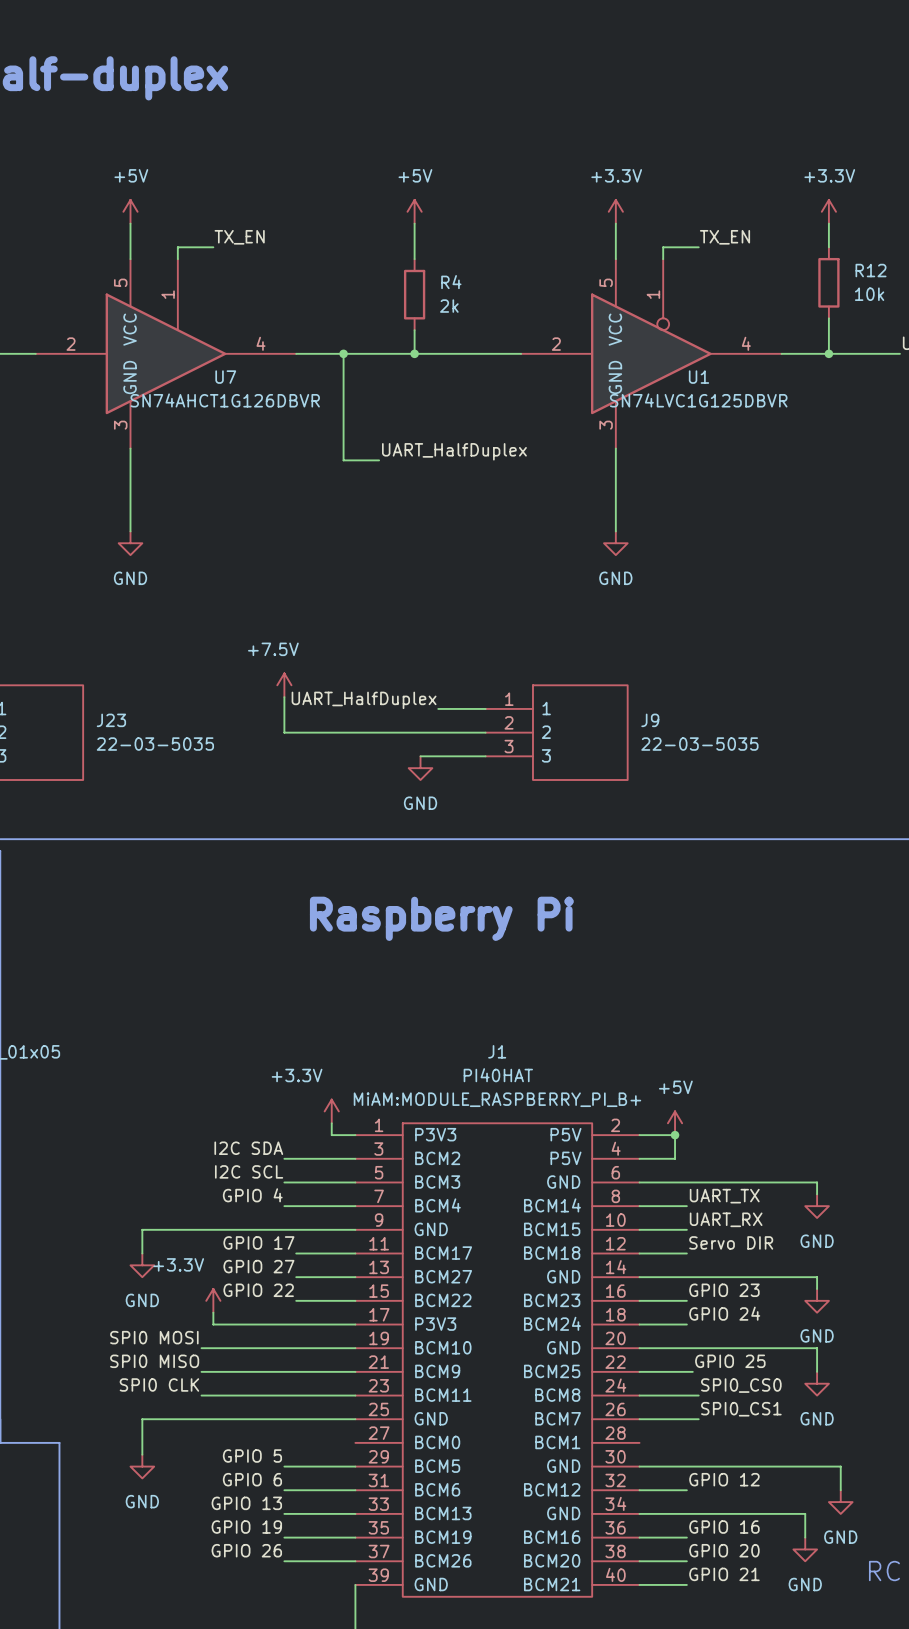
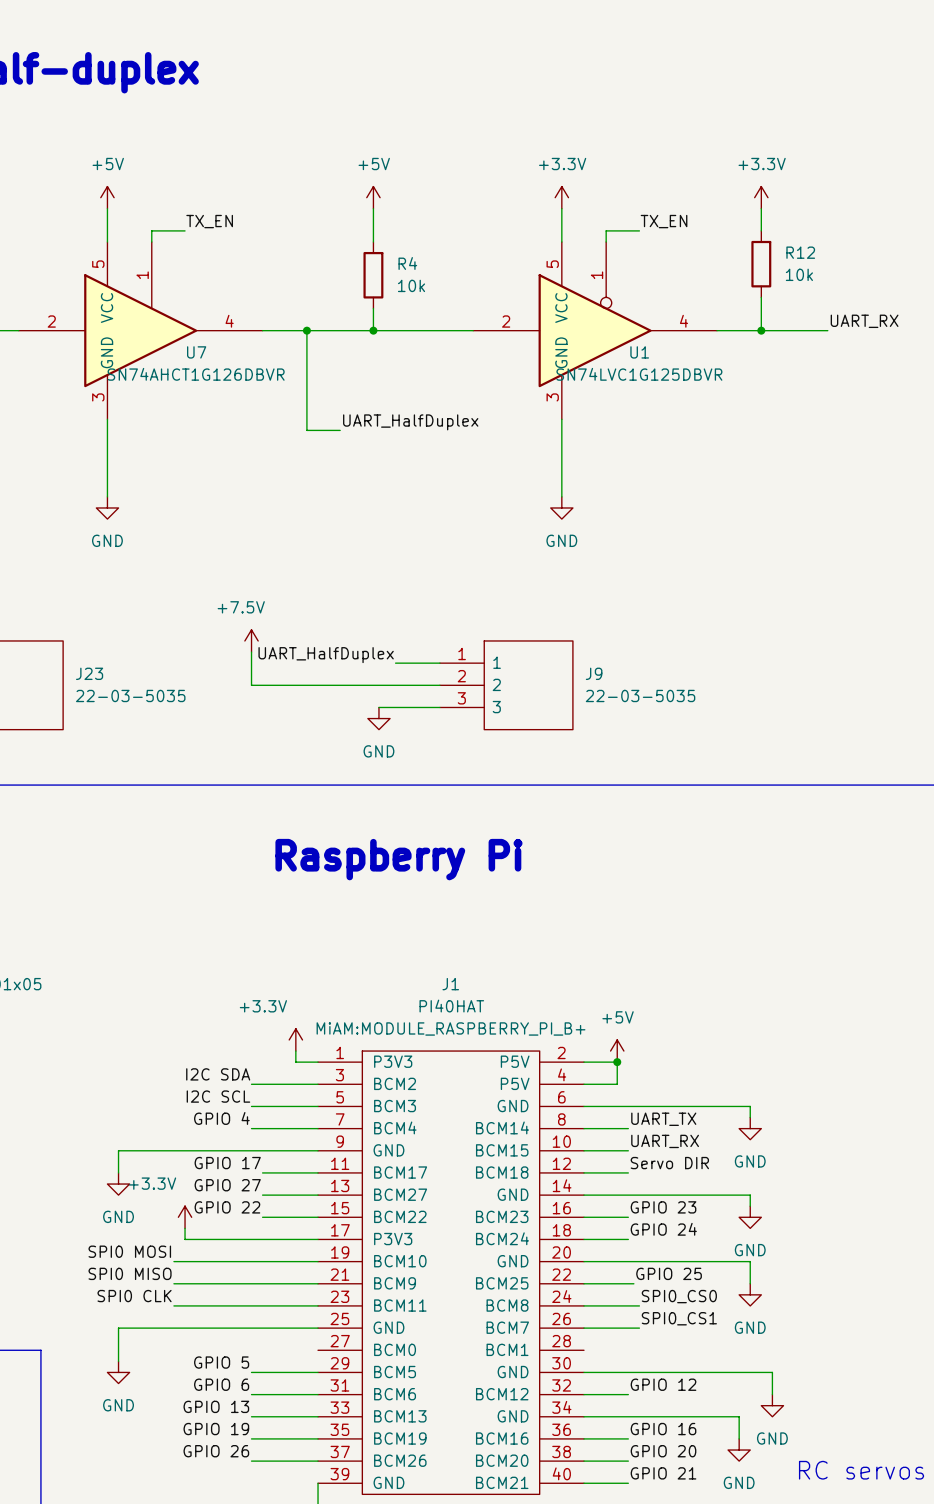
R4 value: 2k (449, 306) -> 10k (411, 285)

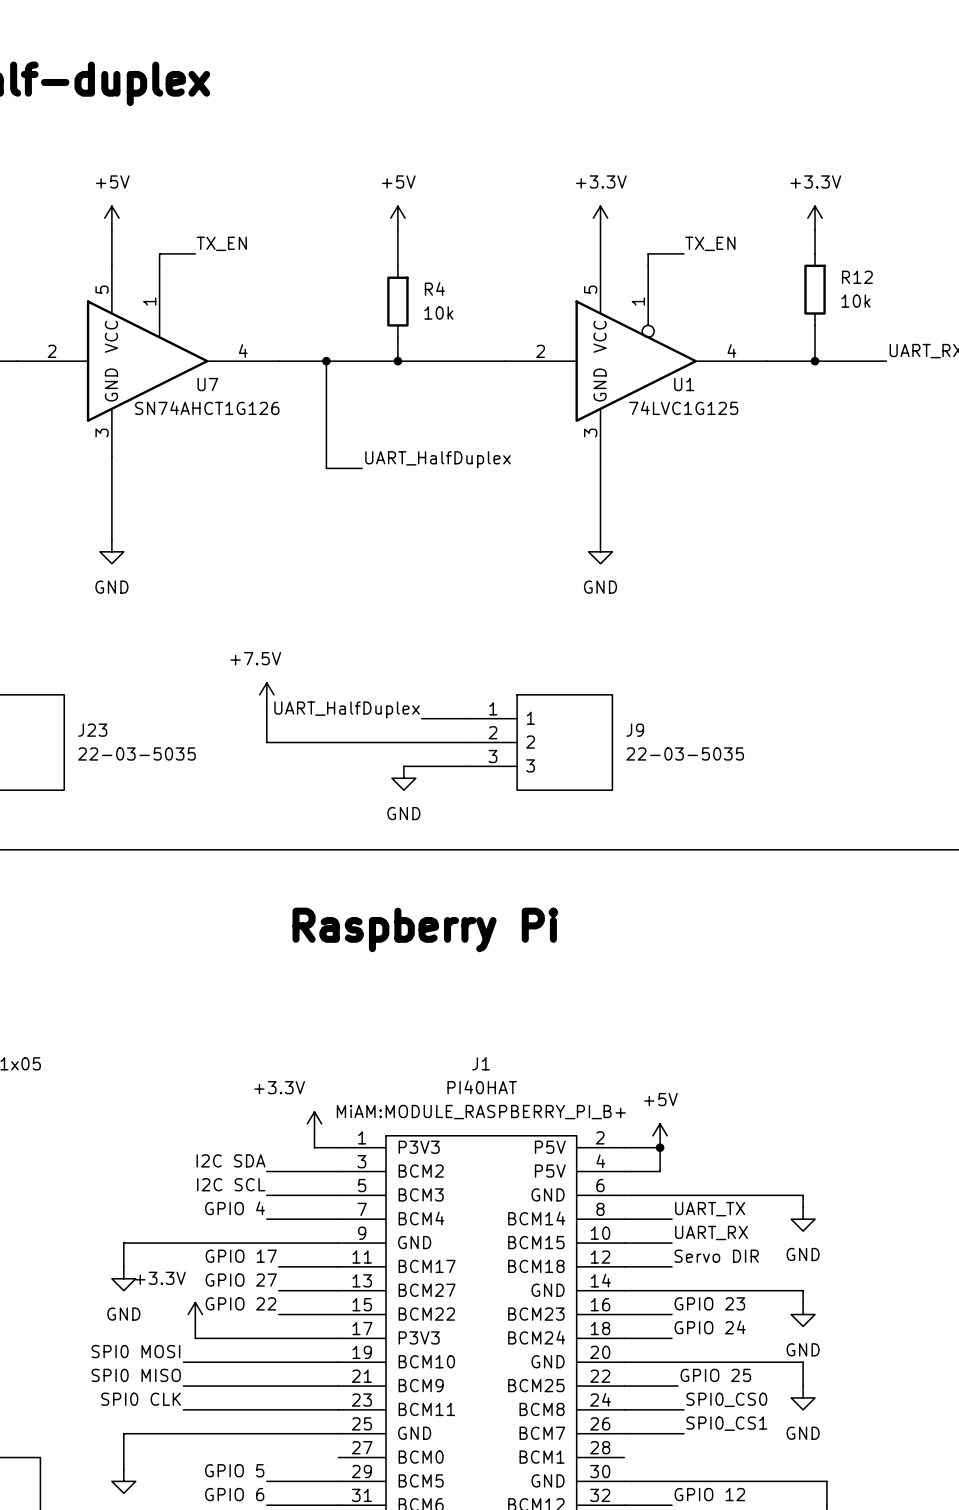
U7 value: SN74AHCT1G126DBVR (196, 374) -> SN74AHCT1G126 (207, 408)
U1 value: SN74LVC1G125DBVR (639, 374) -> 74LVC1G125 (683, 408)

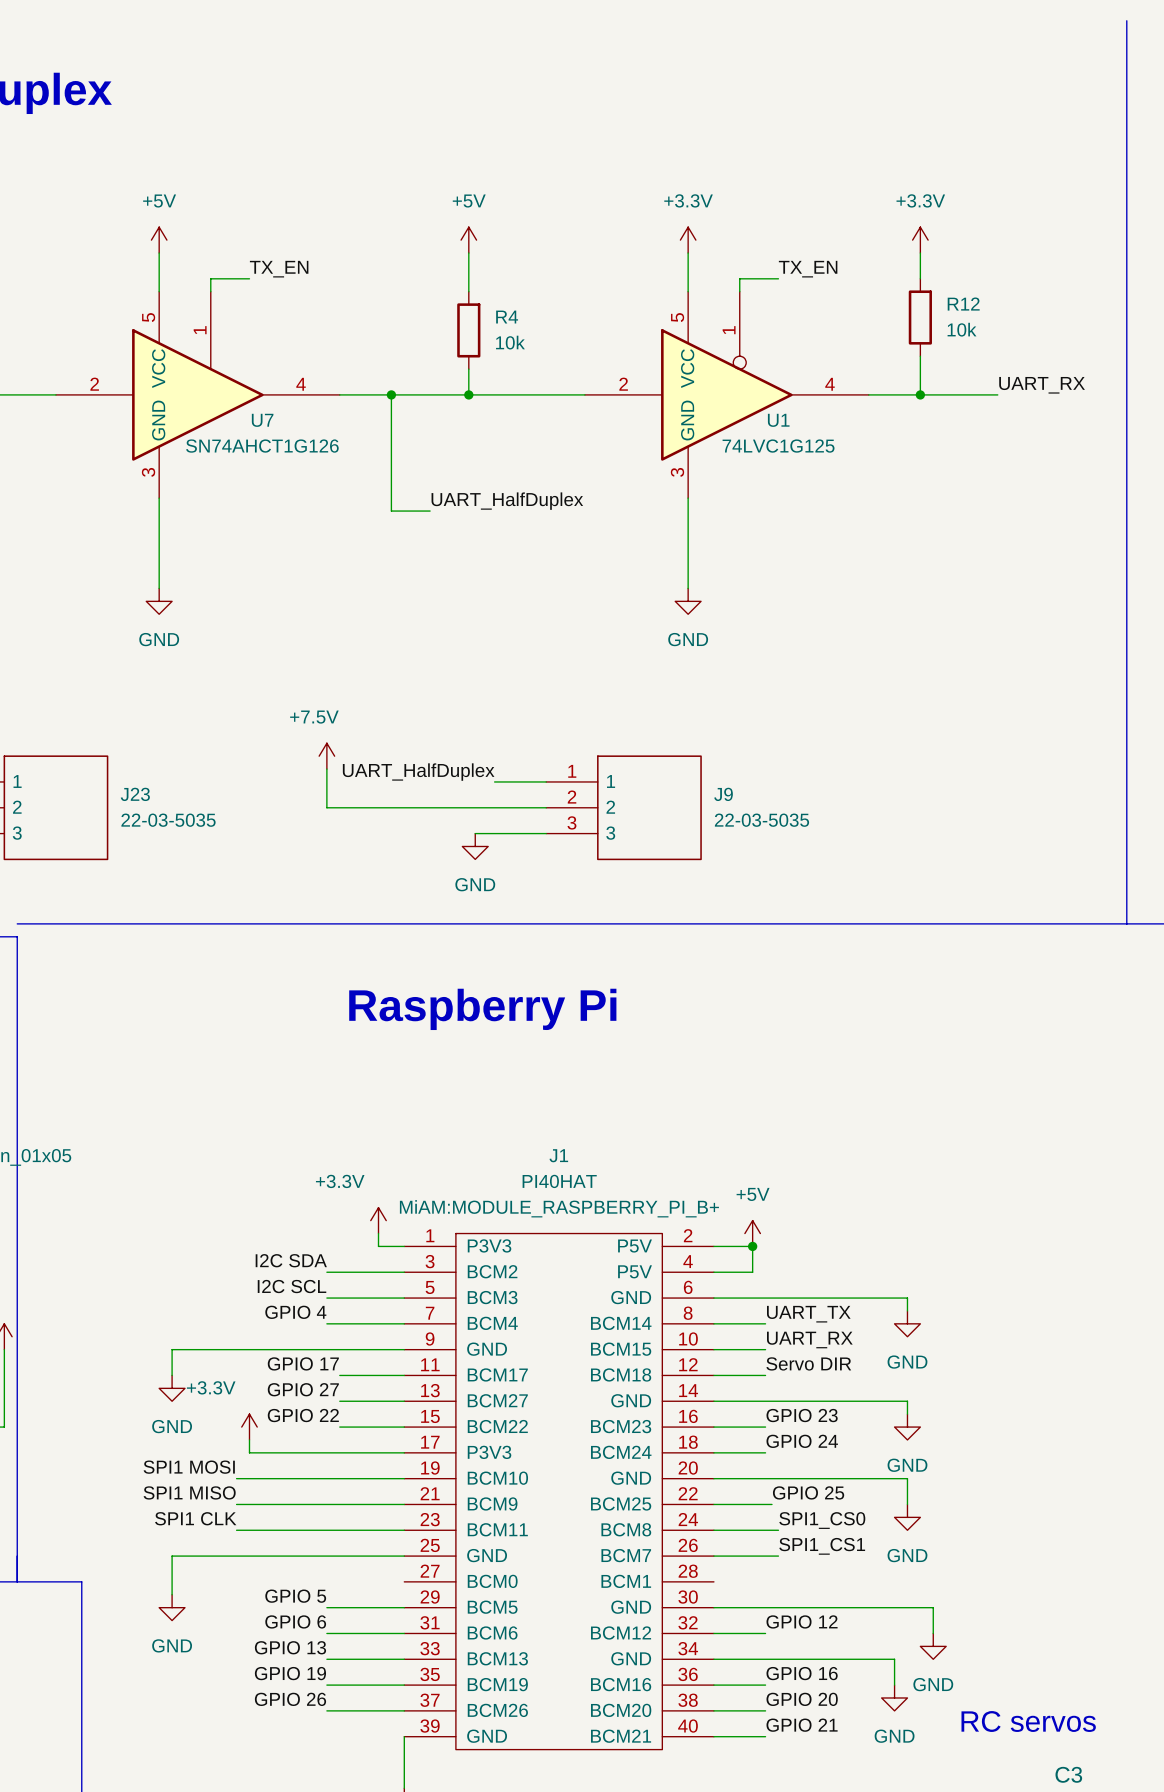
label: SPI0 MOSI (135, 1351) -> SPI1 MOSI (189, 1467)
label: SPI0 MISO (136, 1375) -> SPI1 MISO (189, 1492)
label: SPI0 CLK (141, 1399) -> SPI1 CLK (195, 1518)
label: SPI0_CS0 (726, 1399) -> SPI1_CS0 (822, 1520)
label: SPI0_CS1 (726, 1423) -> SPI1_CS1 (822, 1546)

